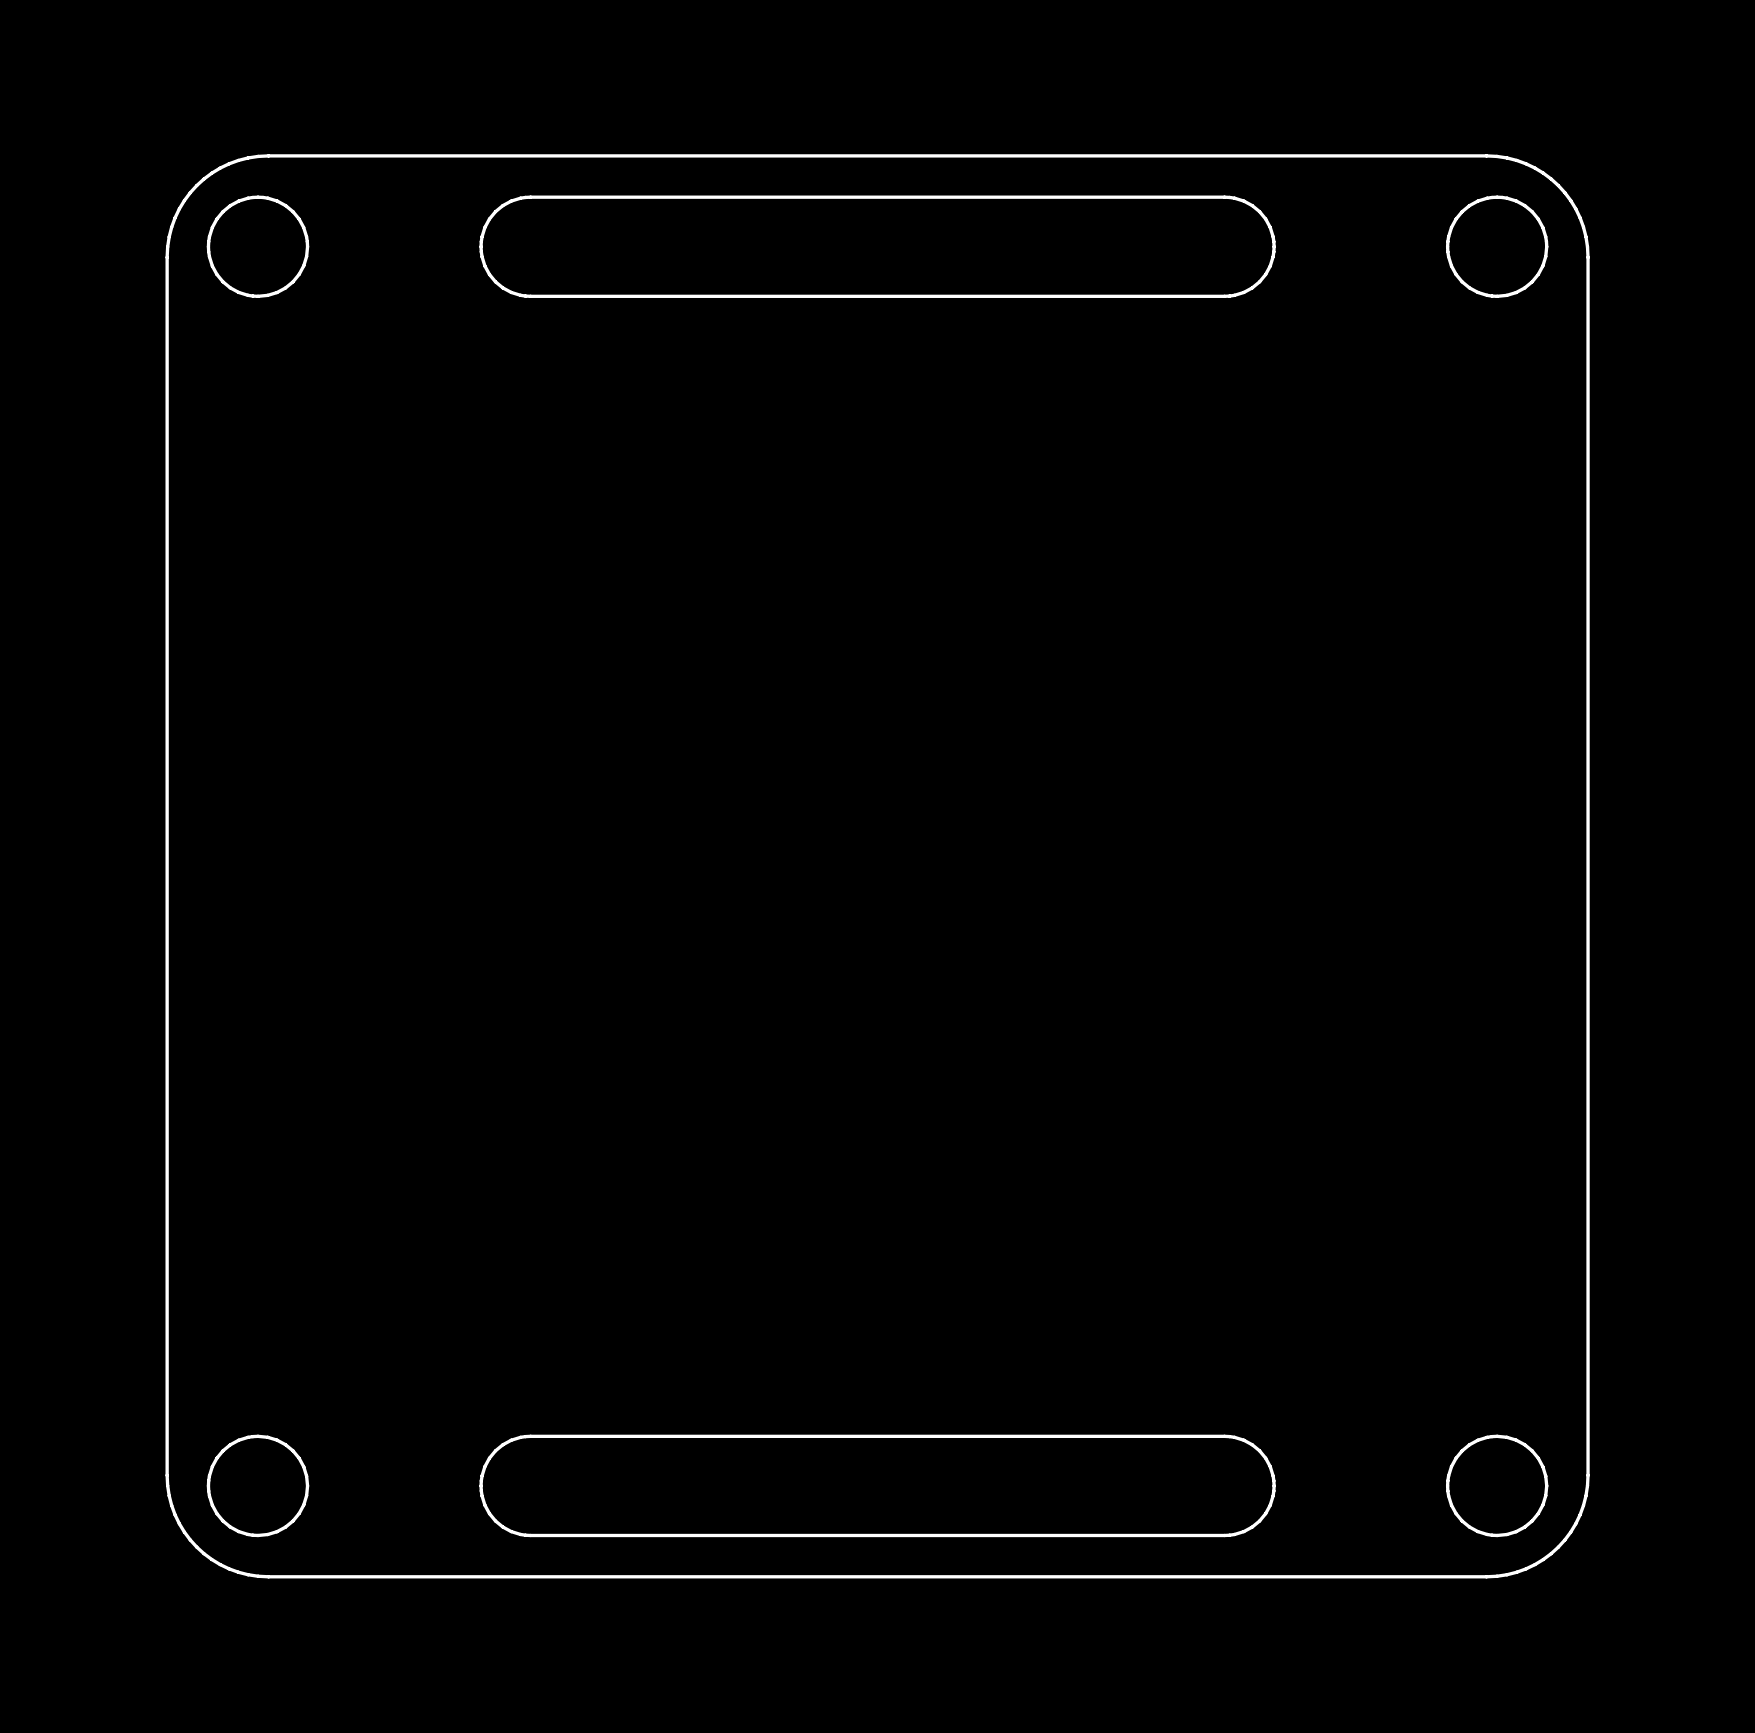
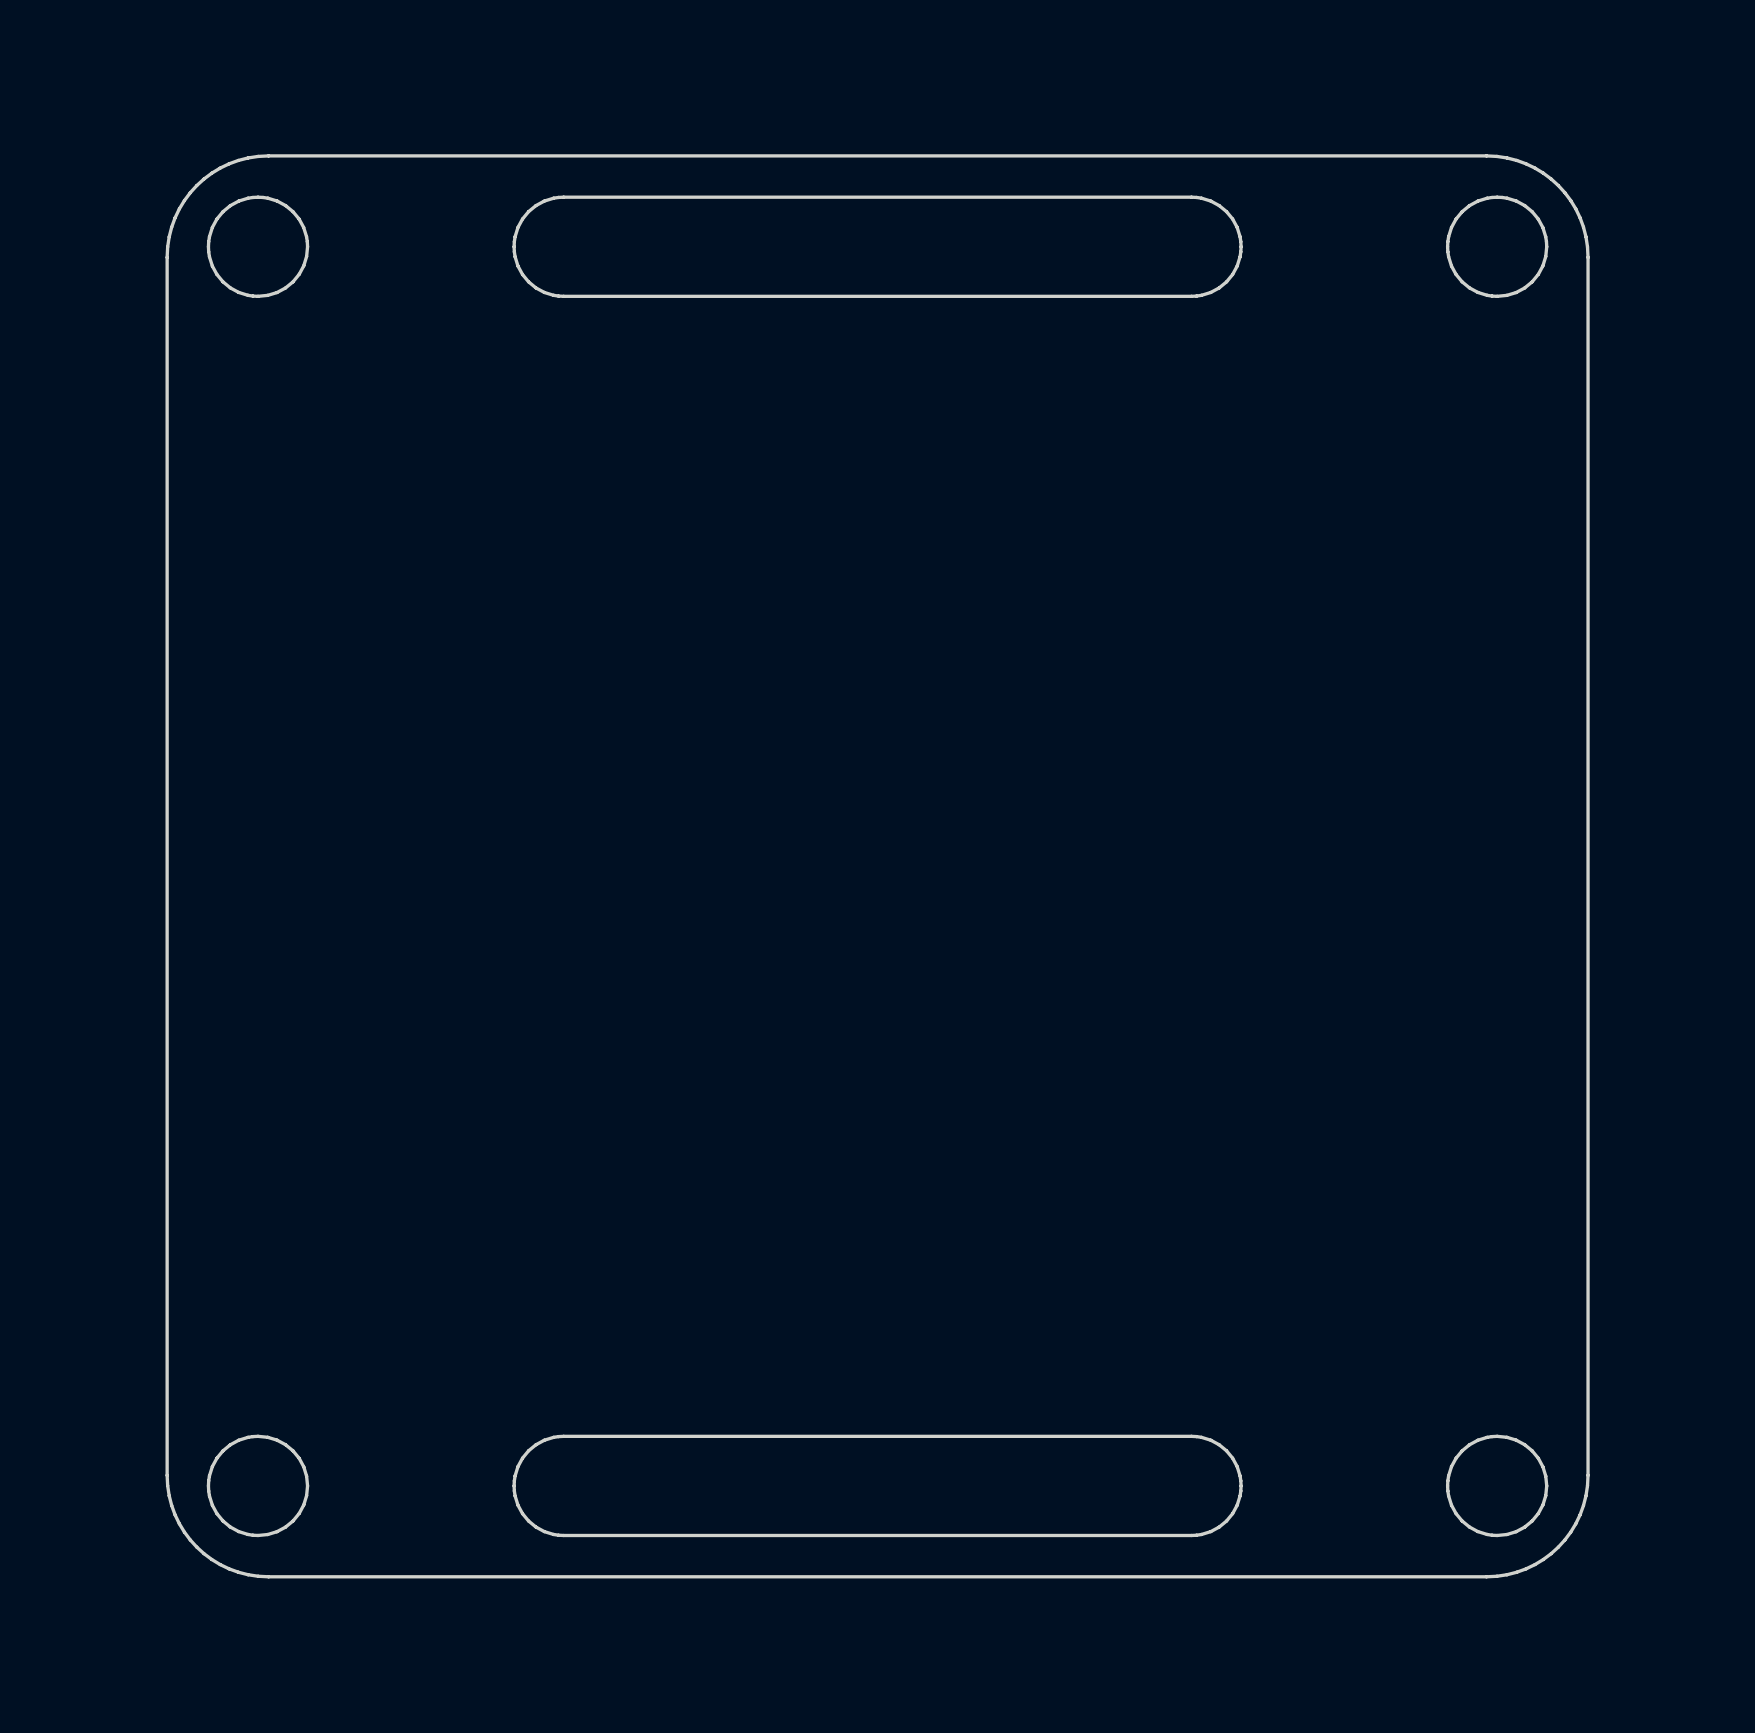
drawing shape: [165, 154, 1590, 1579] -> [165, 154, 1590, 1579]

